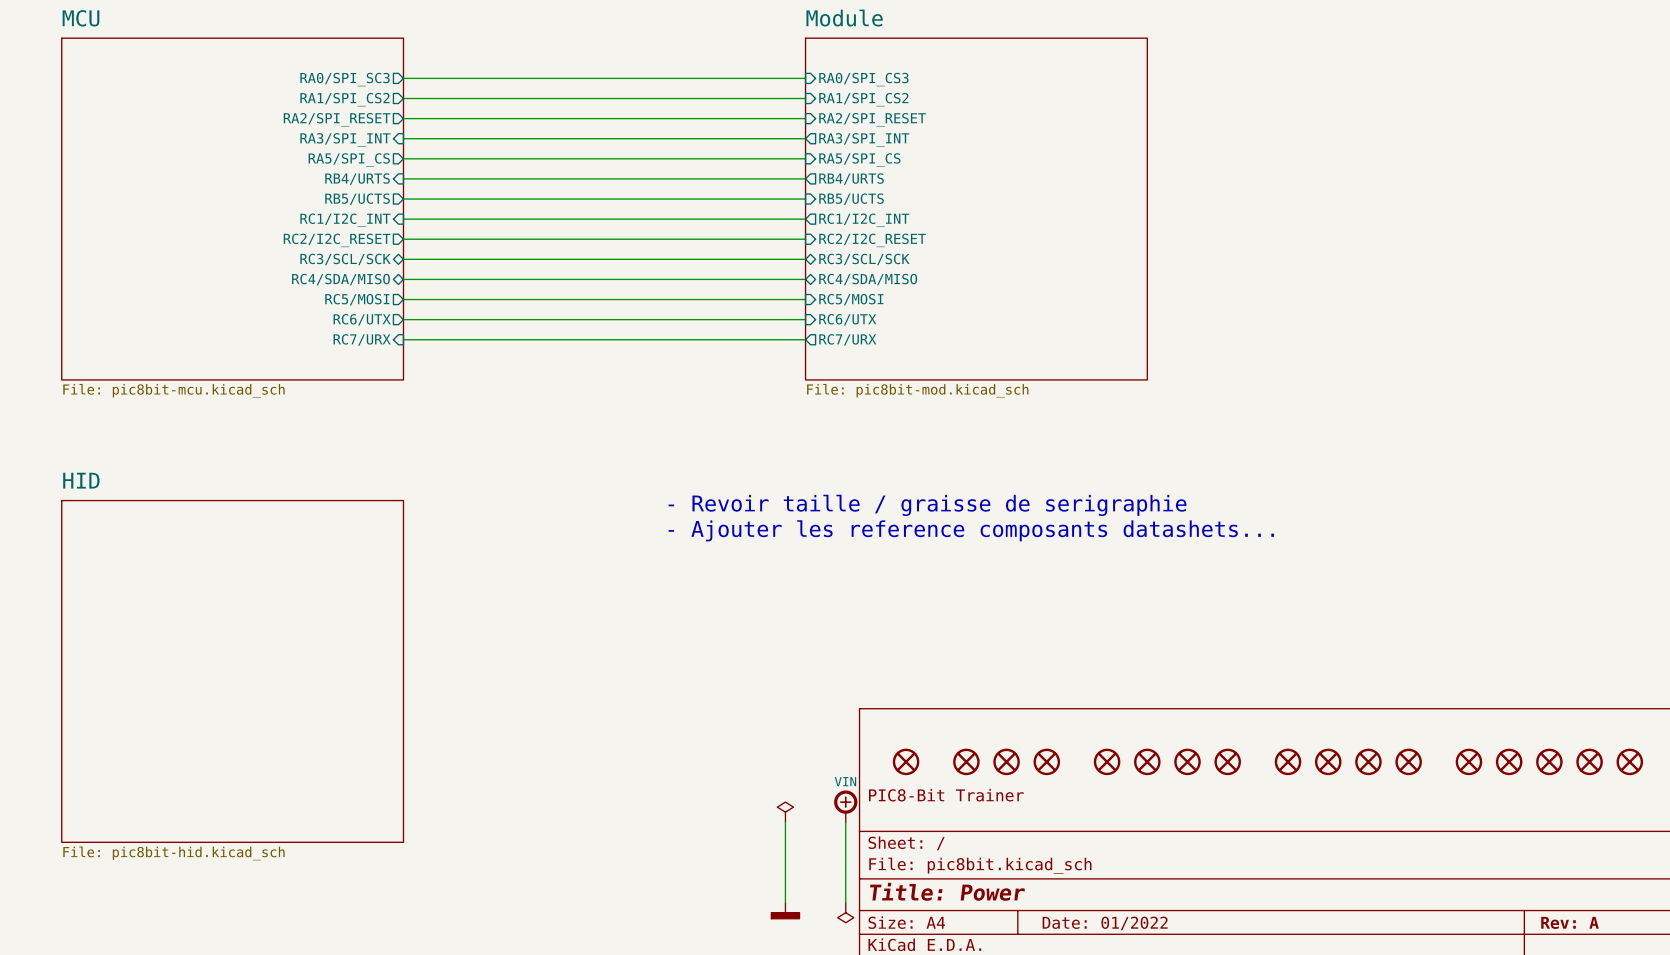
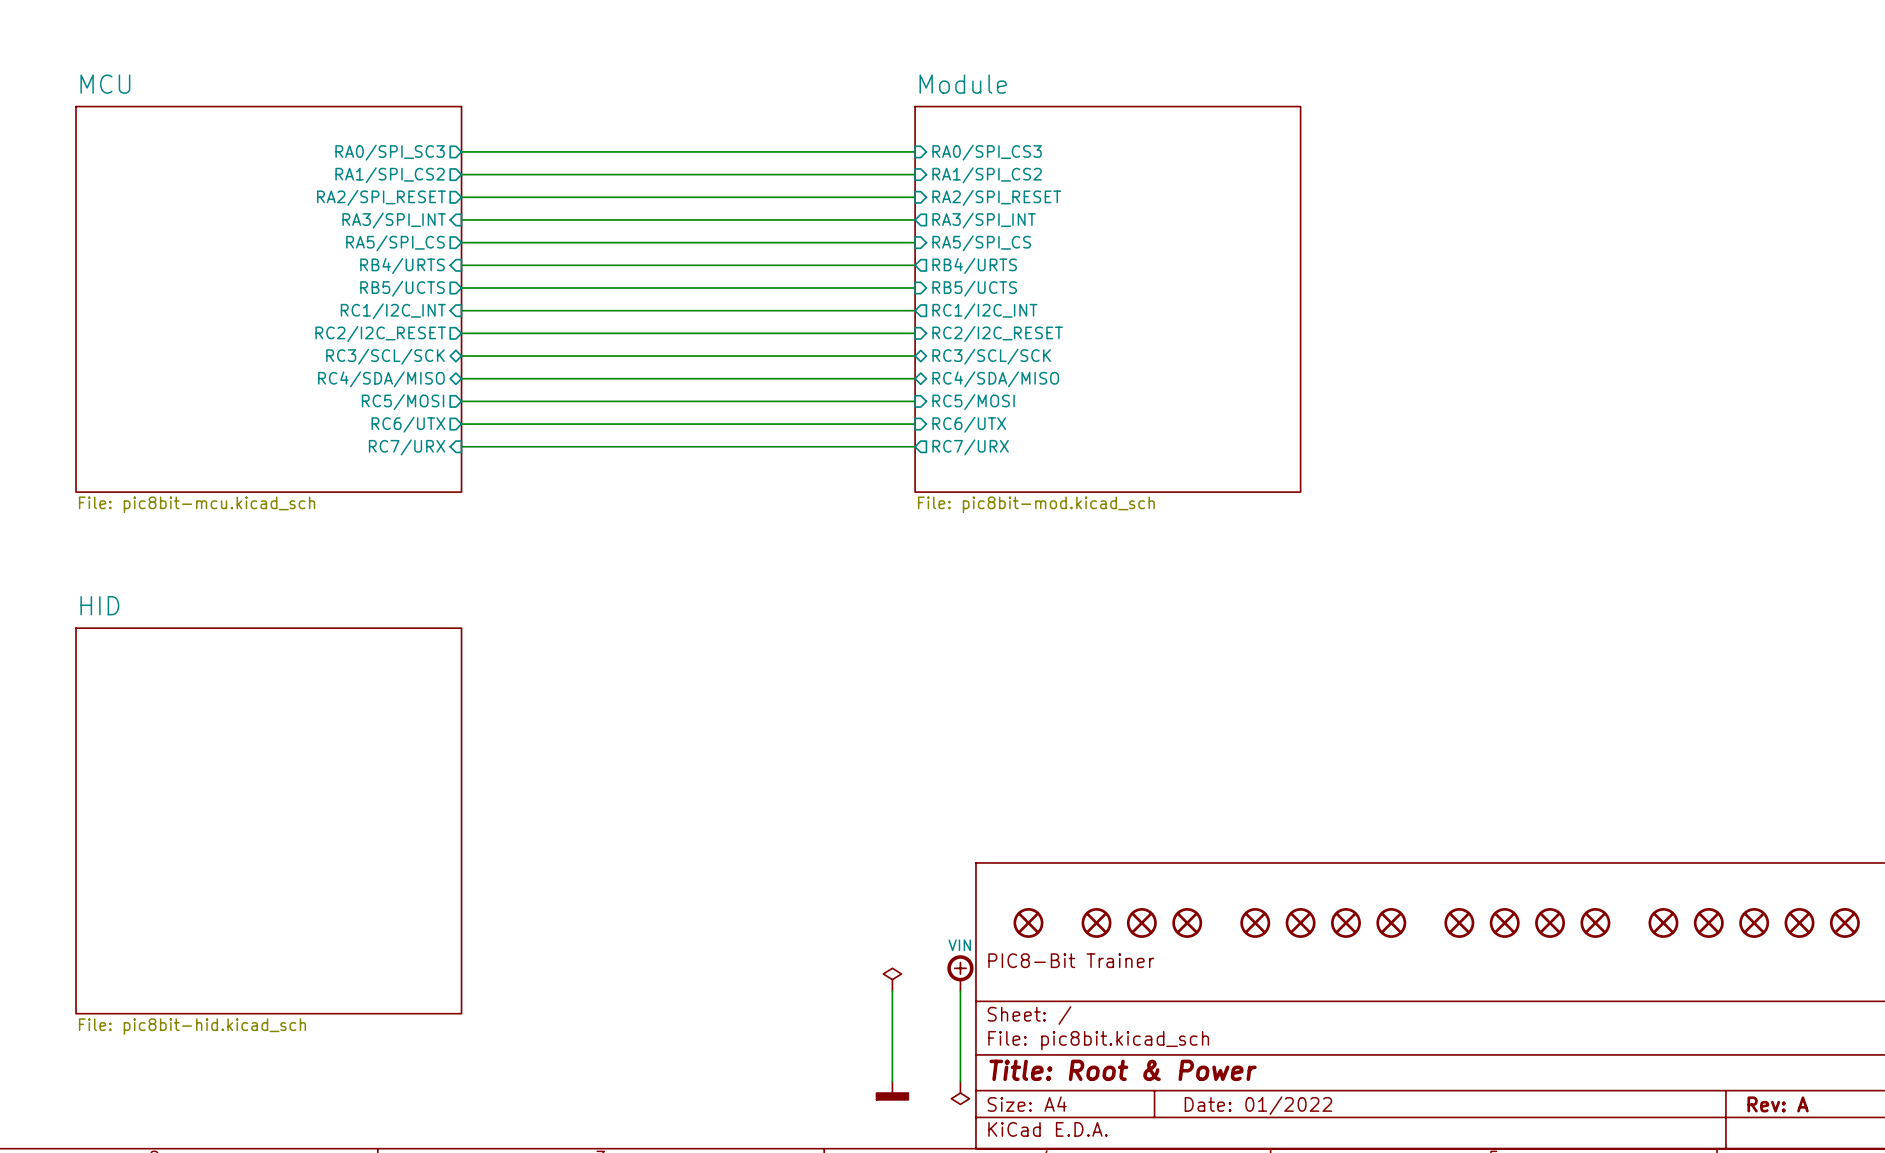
text: - Revoir taille / graisse de serigraphie (927, 505) -> none
text: - Ajouter les reference composants datashets... (971, 530) -> none
title block: Title: Power (947, 891) -> Title: Root & Power (1123, 1070)

